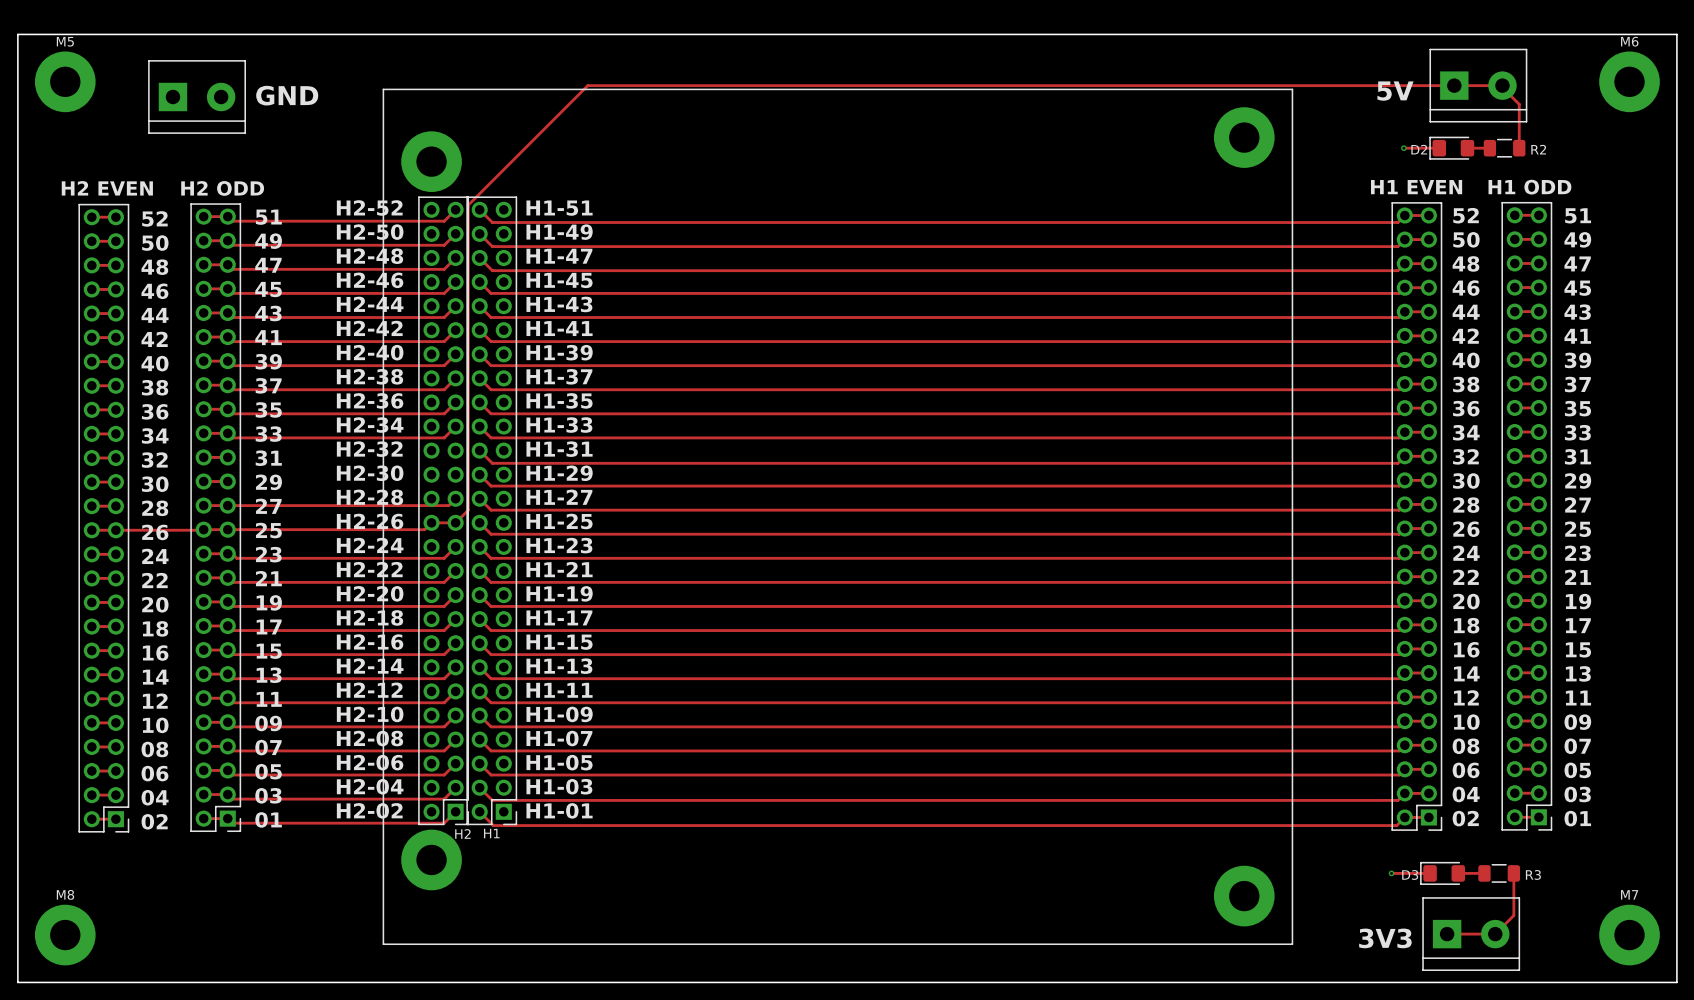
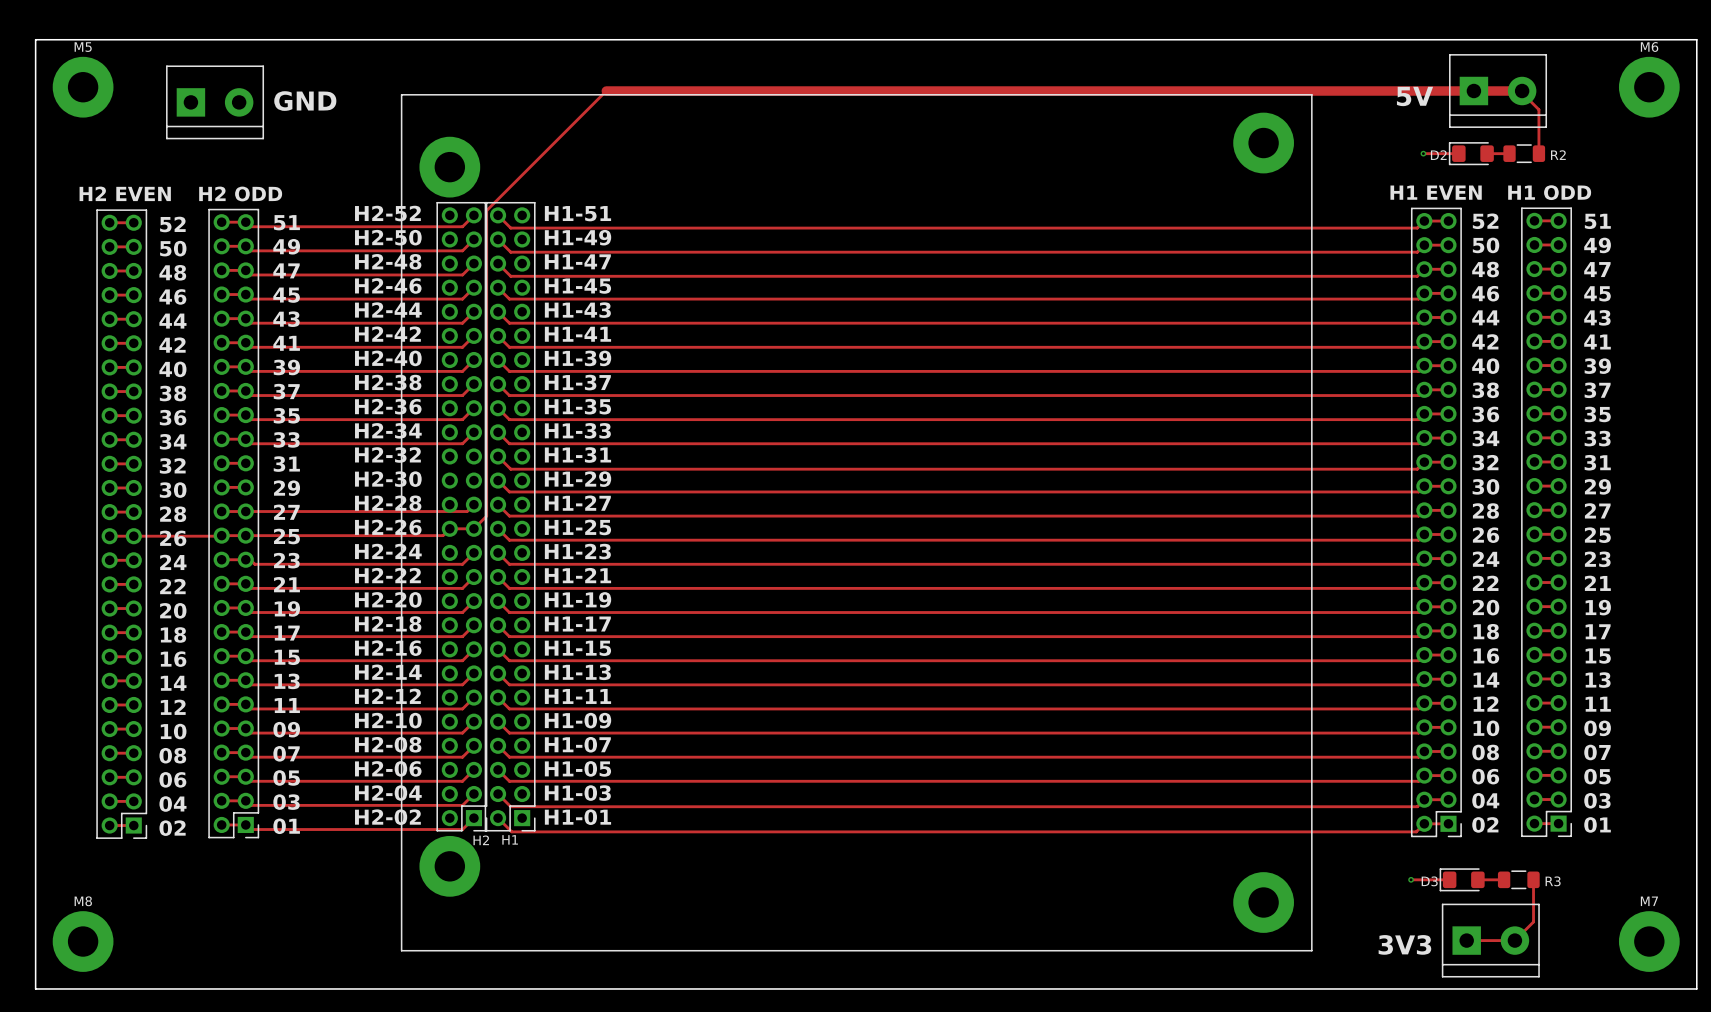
track width: thin (587, 85) (1502, 85) -> thick (606, 91) (1522, 91)

